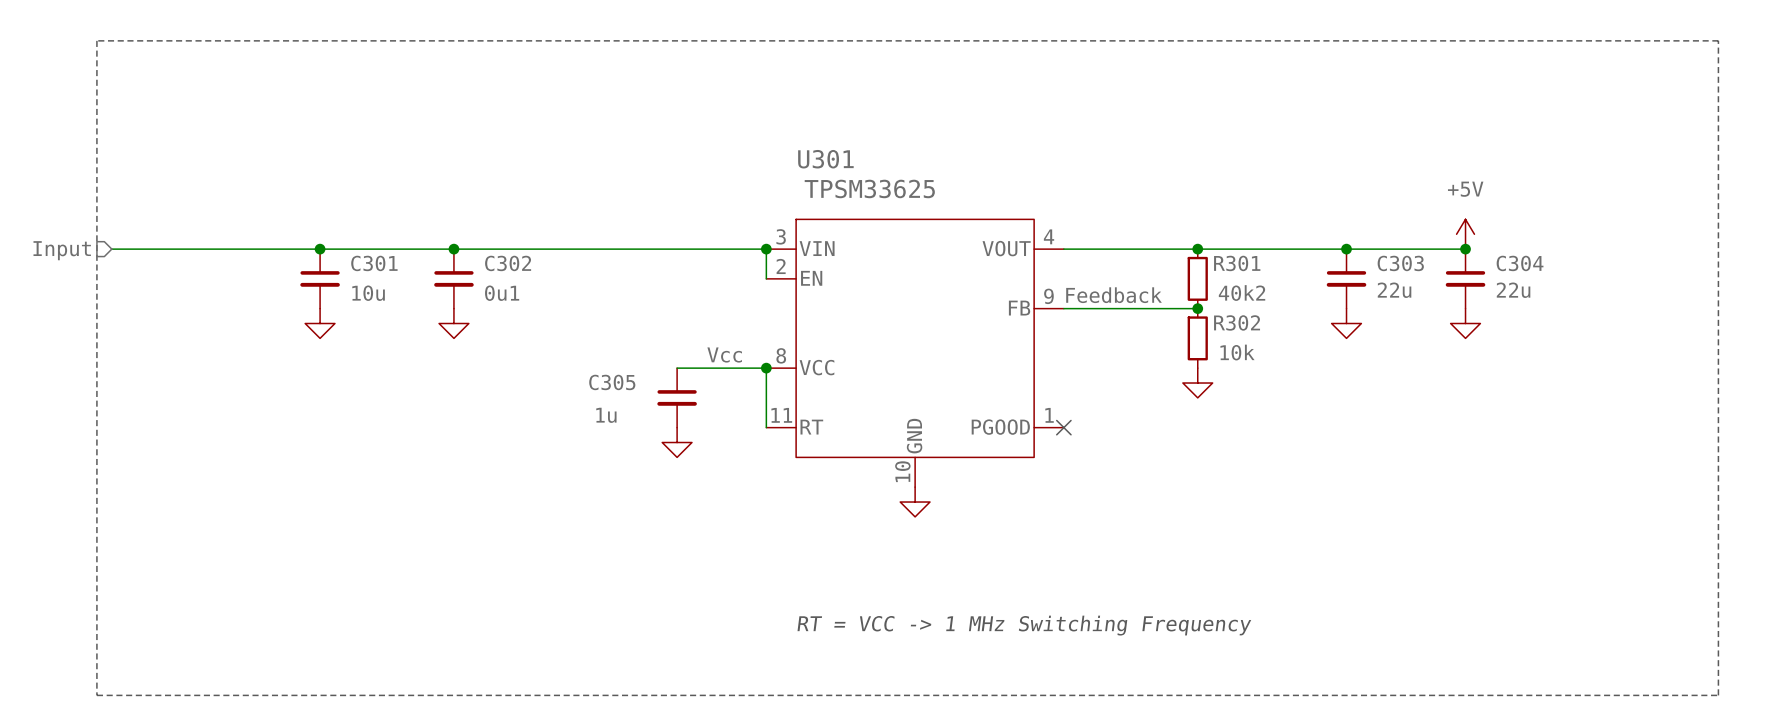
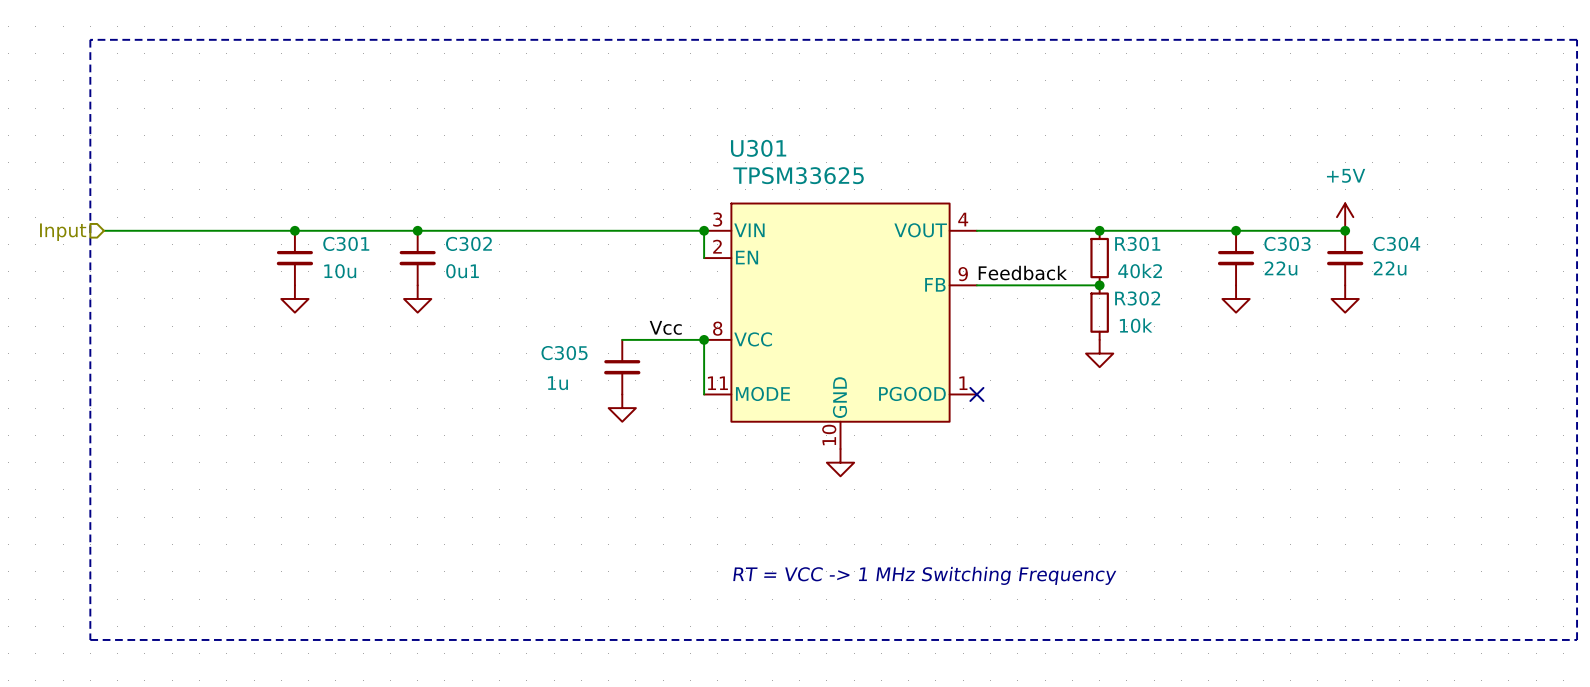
U301 pin name: RT (811, 427) -> MODE (762, 393)

